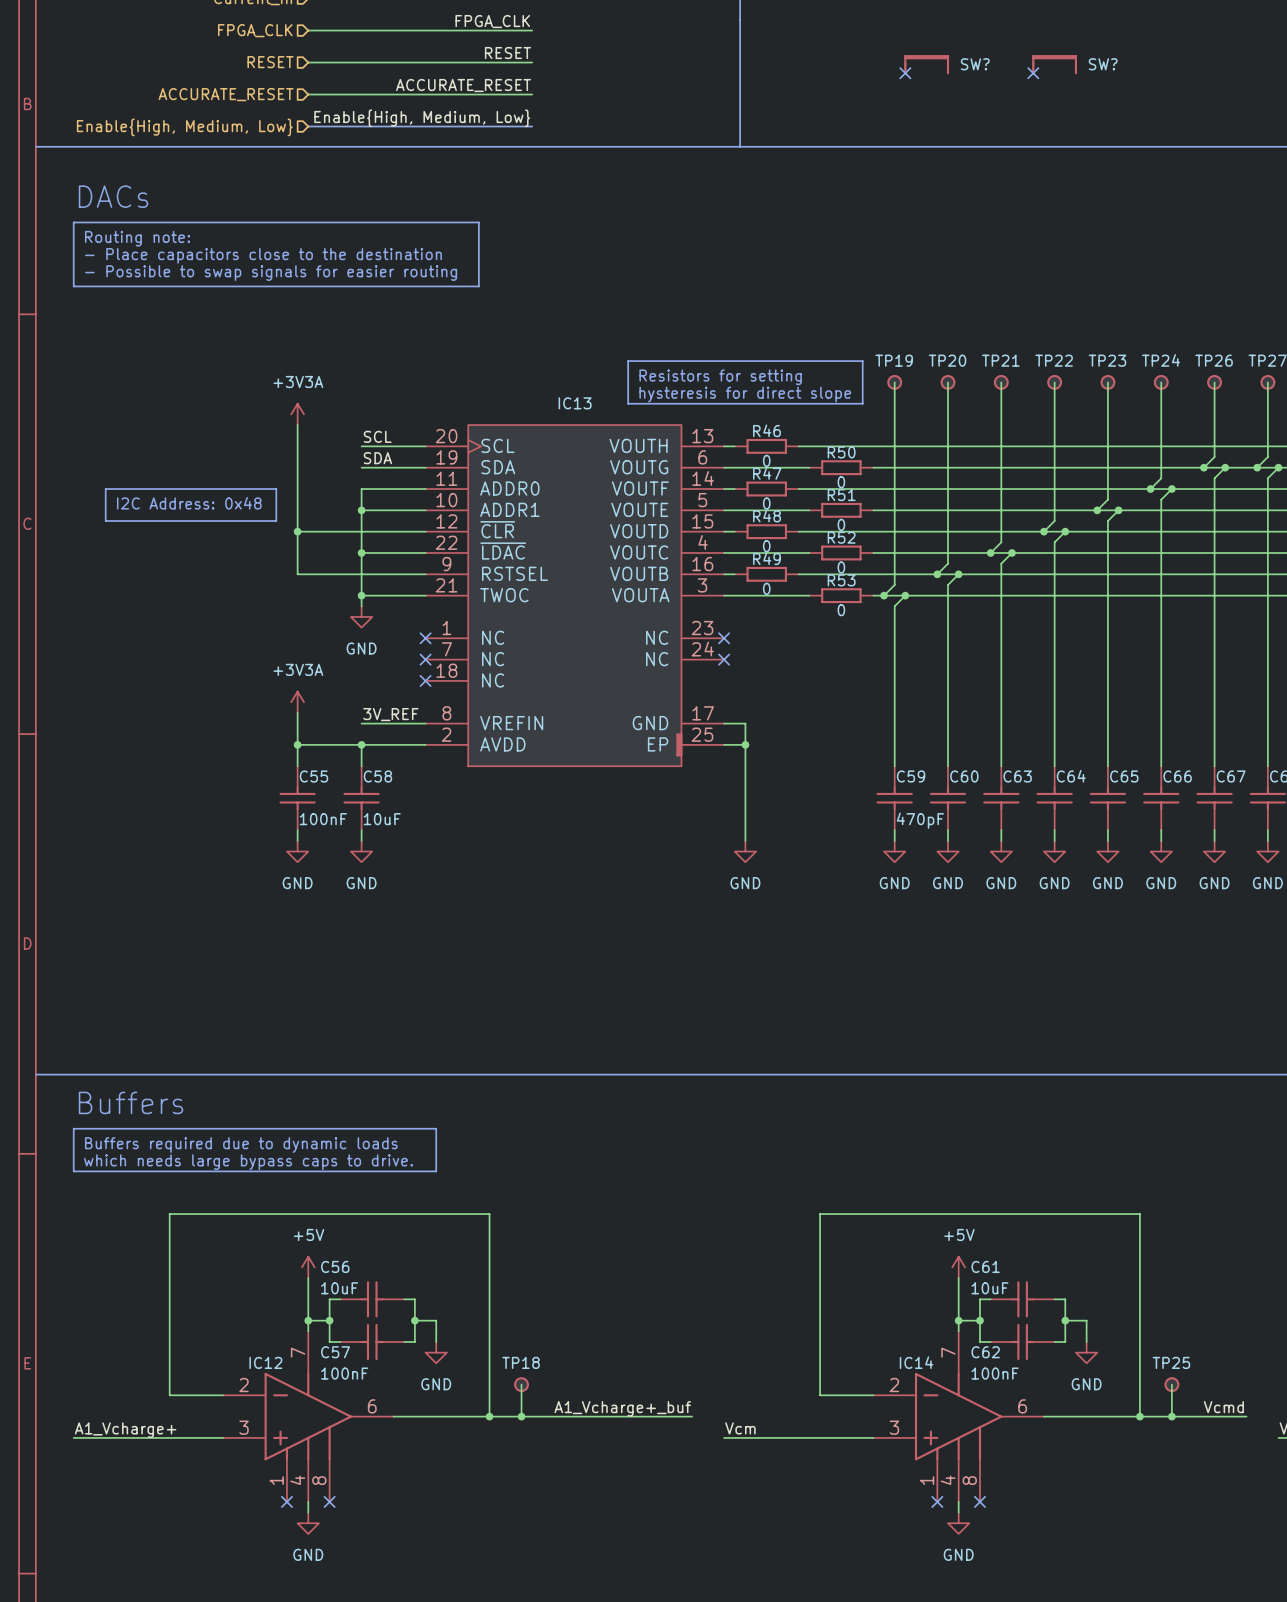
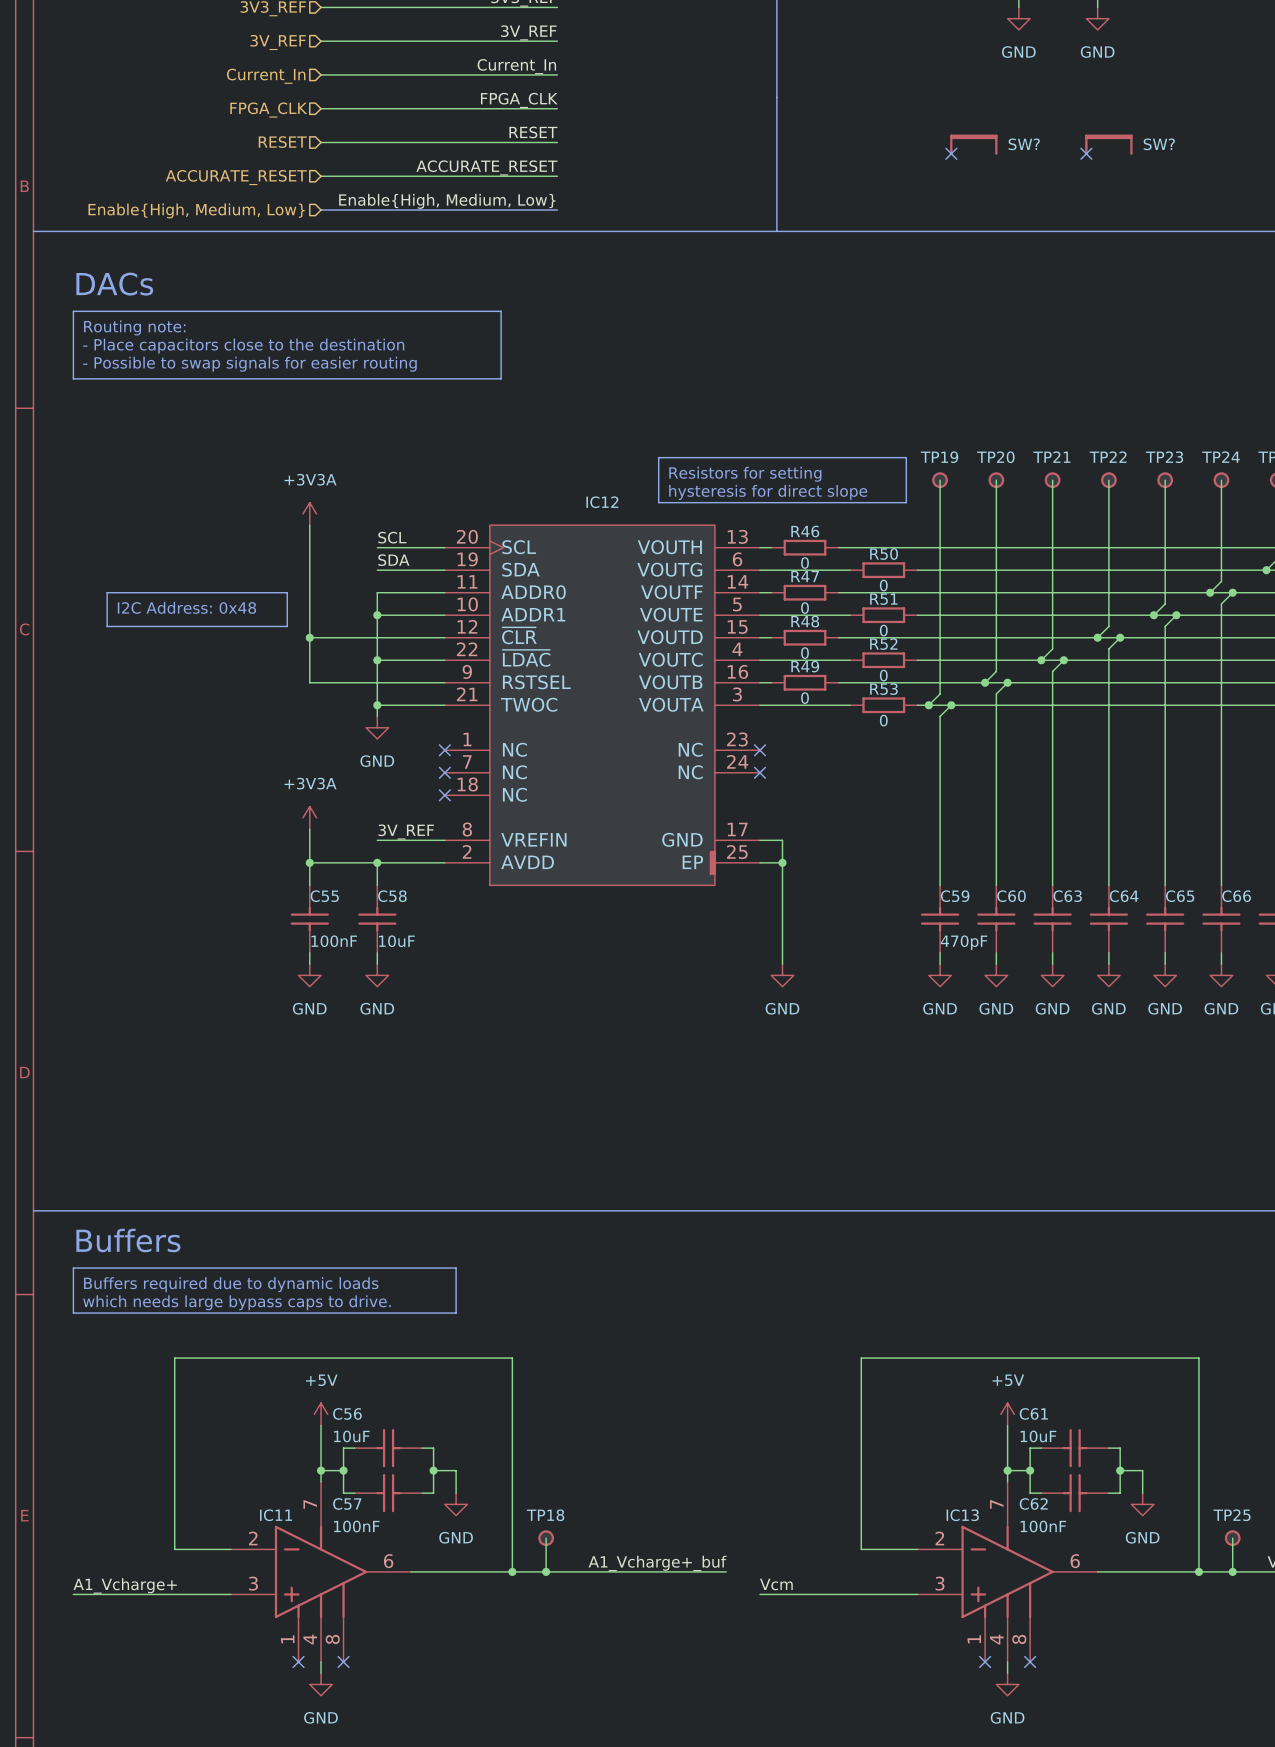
IC13 name: IC13 (575, 403) -> IC12 (602, 502)
IC12 name: IC12 (265, 1362) -> IC11 (276, 1515)
IC14 name: IC14 (916, 1362) -> IC13 (962, 1515)

